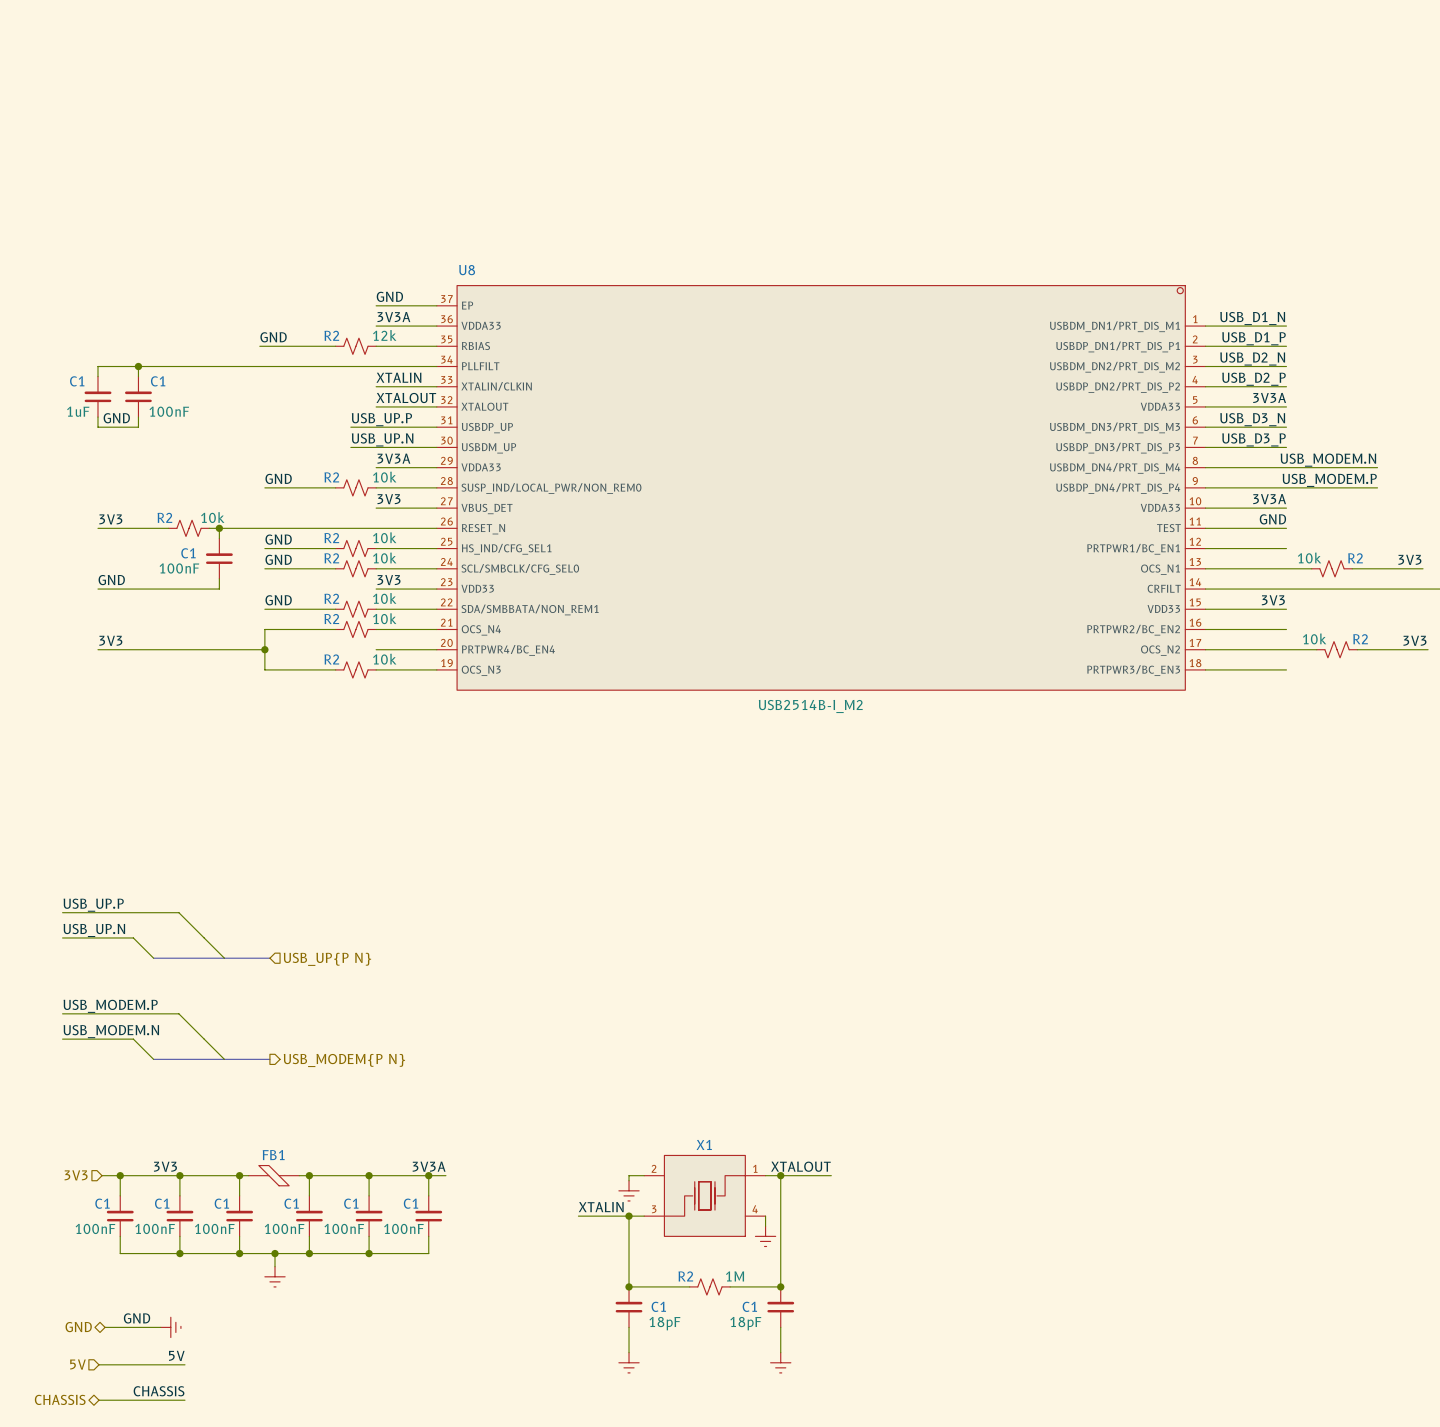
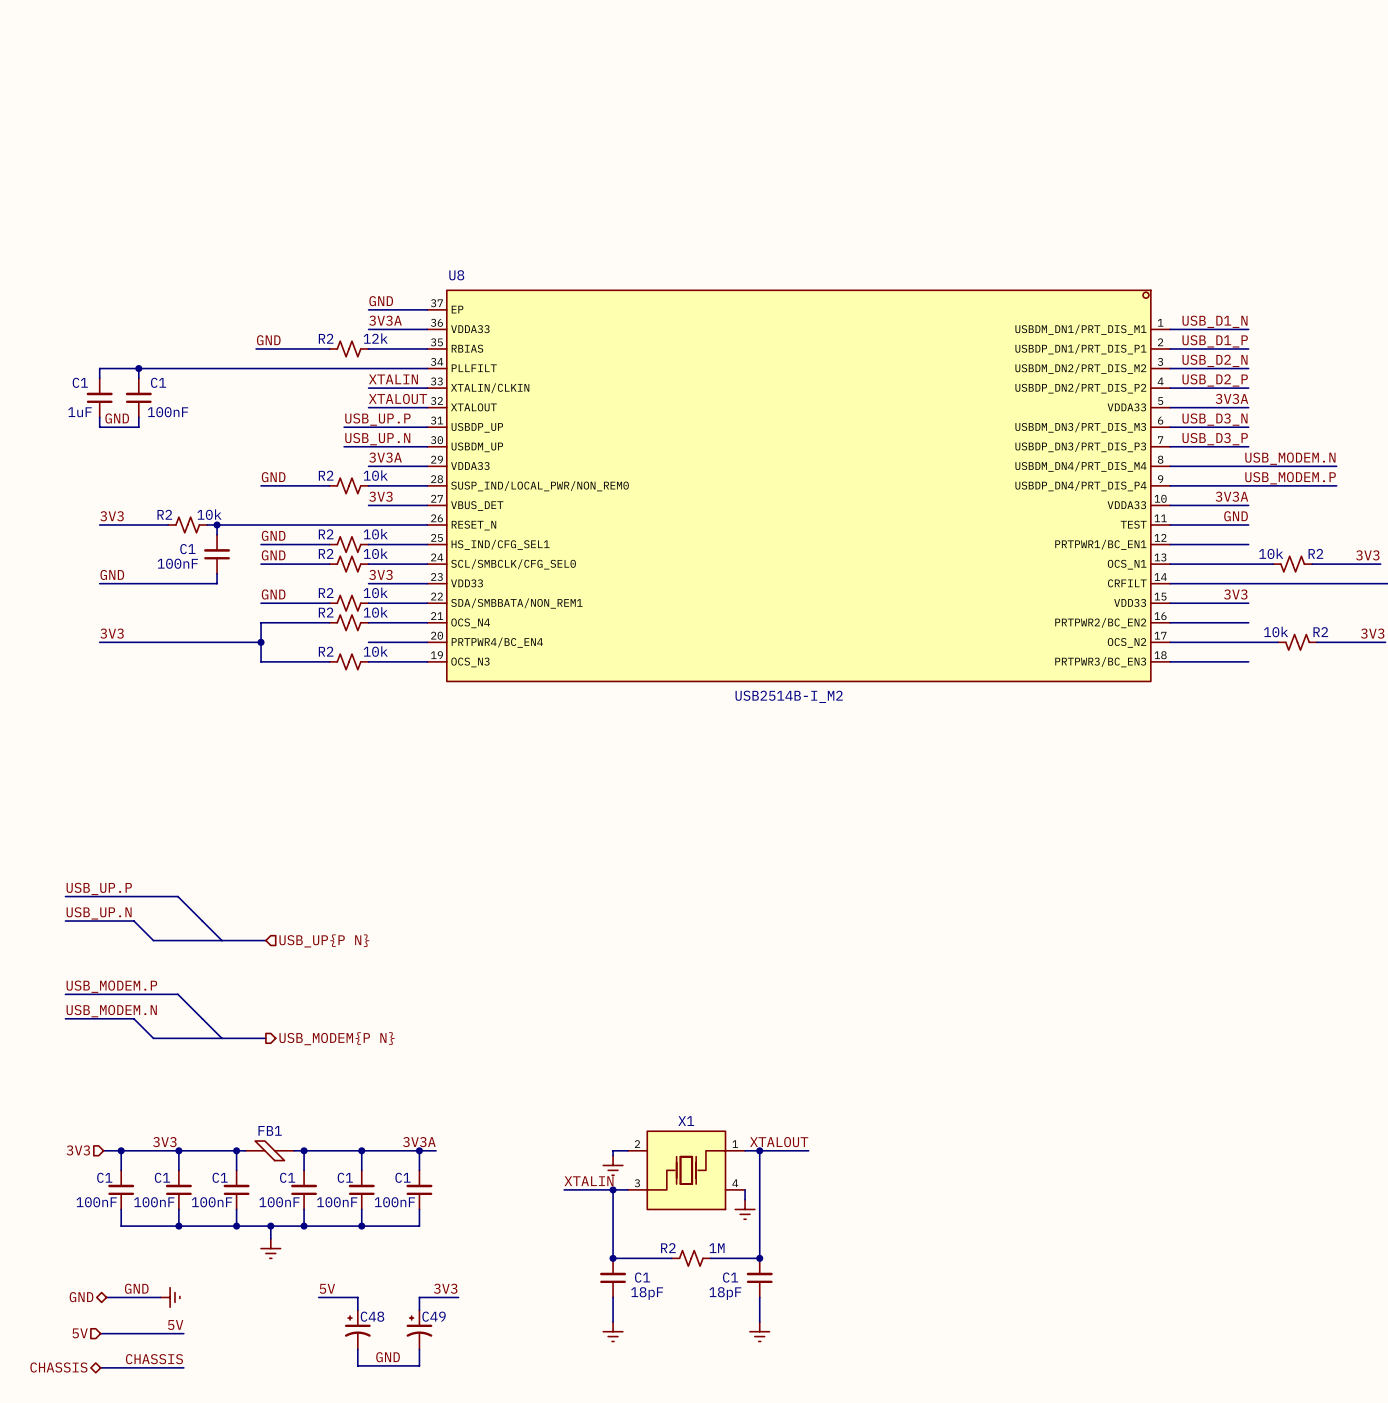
label: none -> 5V (327, 1288)
label: none -> 3V3 (445, 1288)
wire: none -> (318, 1297) (357, 1297) (357, 1310)
wire: none -> (458, 1297) (419, 1297) (419, 1310)
C48: none -> (357, 1329)
C49: none -> (419, 1329)
wire: none -> (357, 1349) (357, 1365) (419, 1365) (419, 1349)
label: none -> GND (388, 1357)

